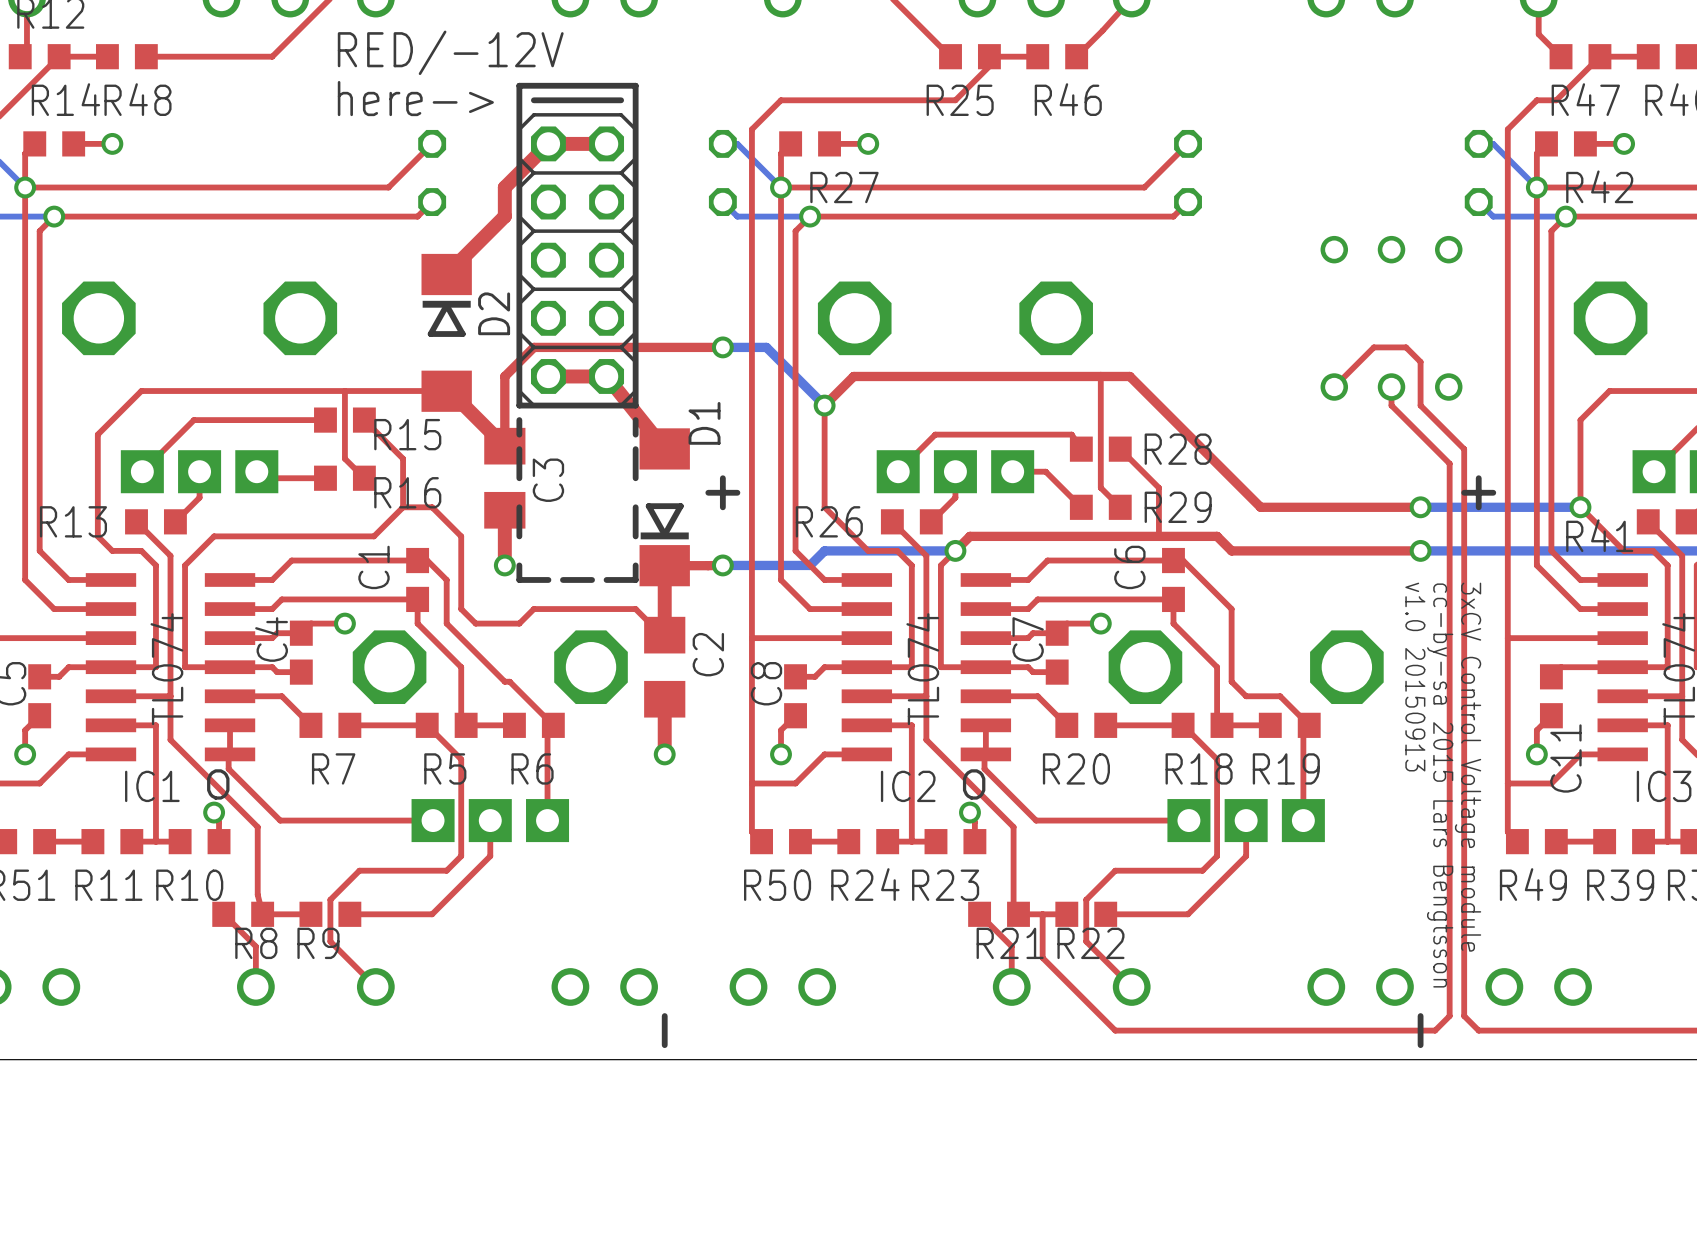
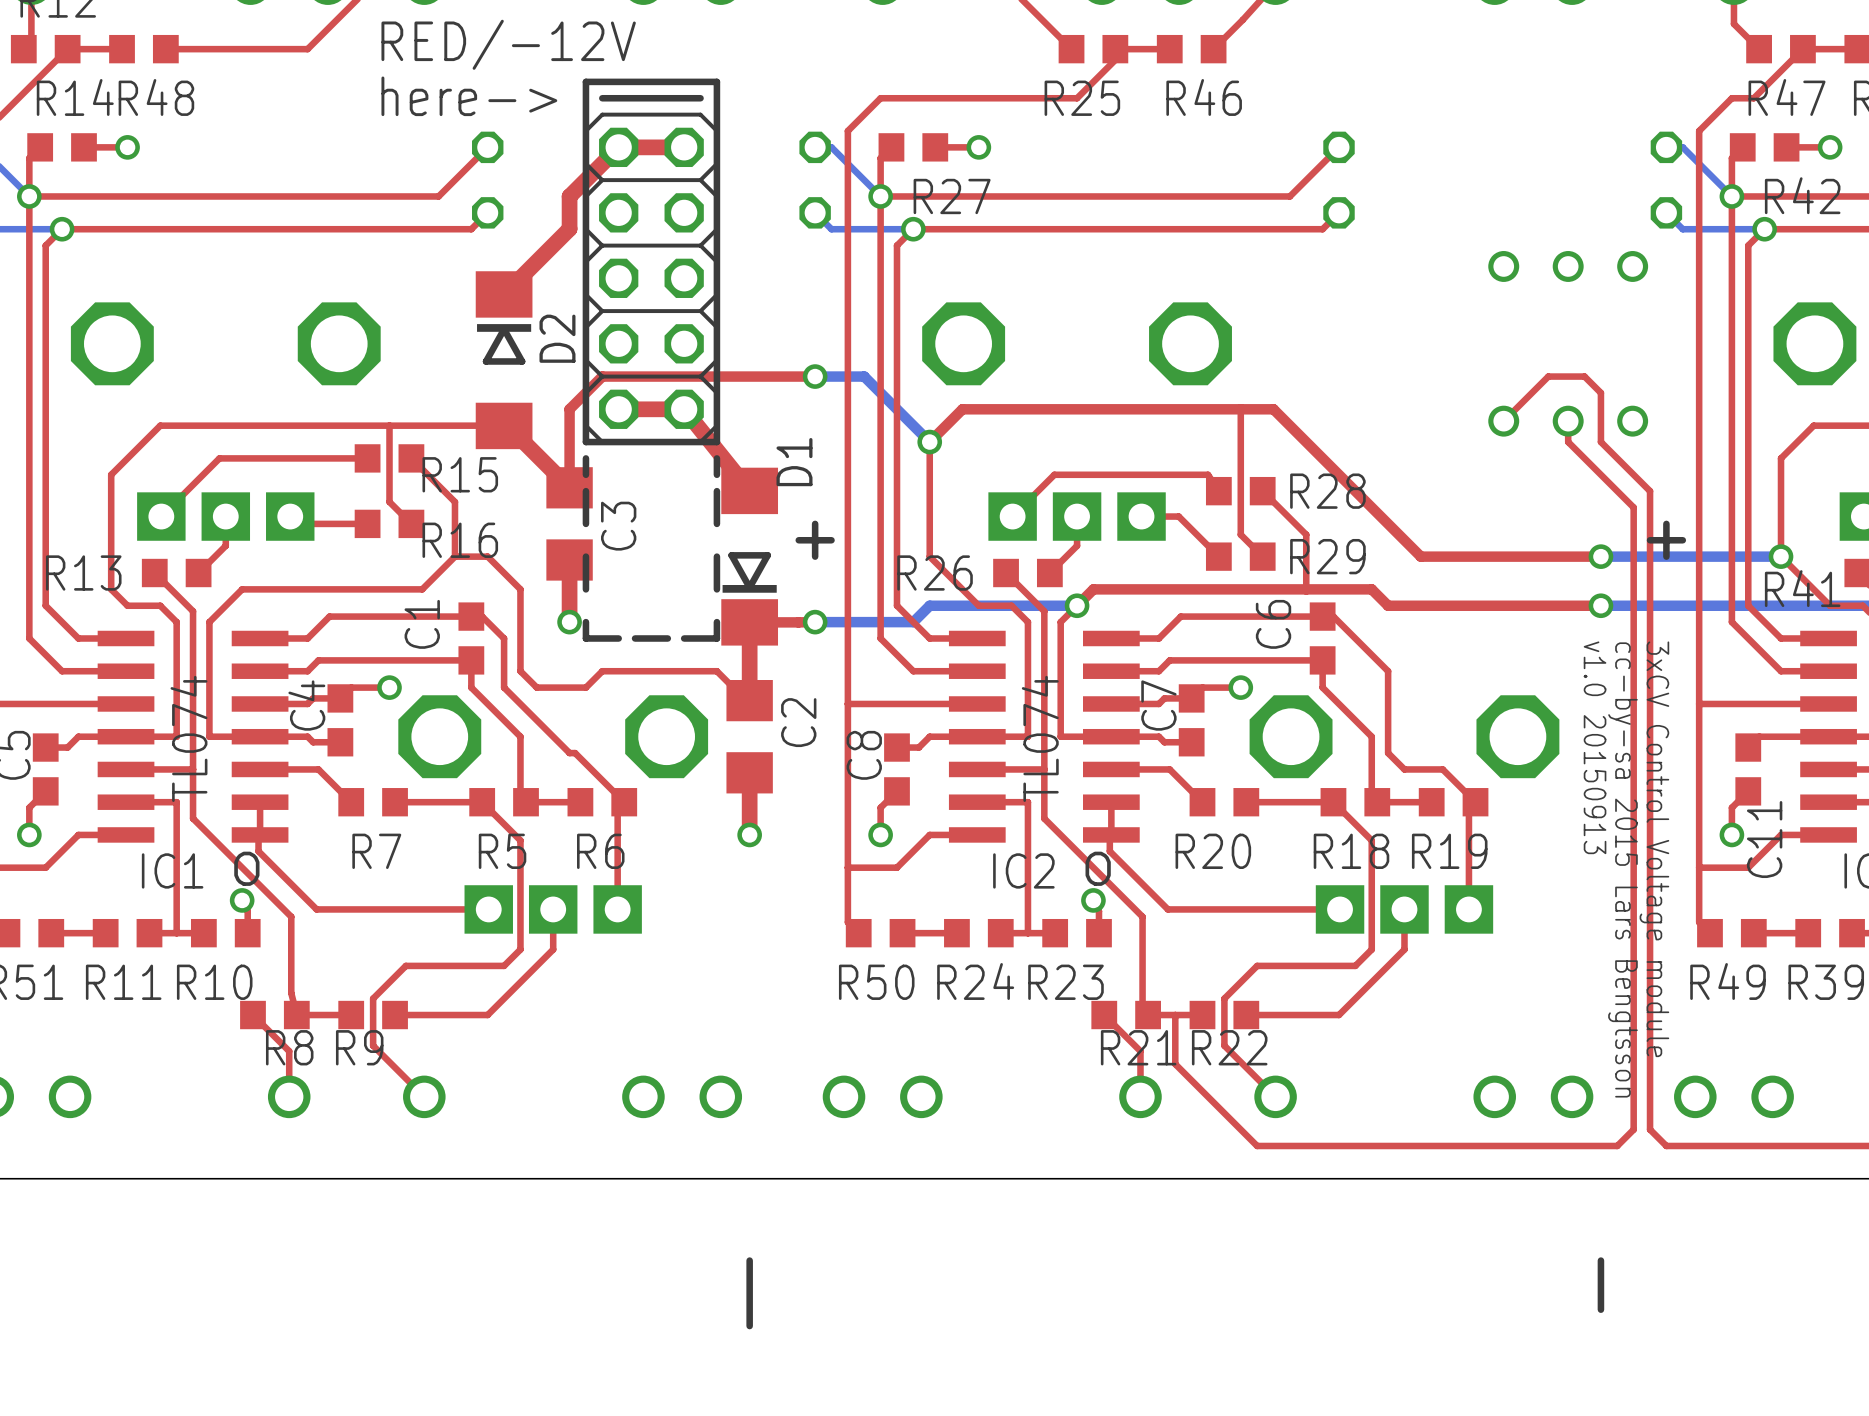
line: (664, 1016) (664, 1045) -> none
line: (1420, 1016) (1420, 1045) -> none
line: none -> (749, 1260) (749, 1326)
line: none -> (1600, 1260) (1600, 1309)

